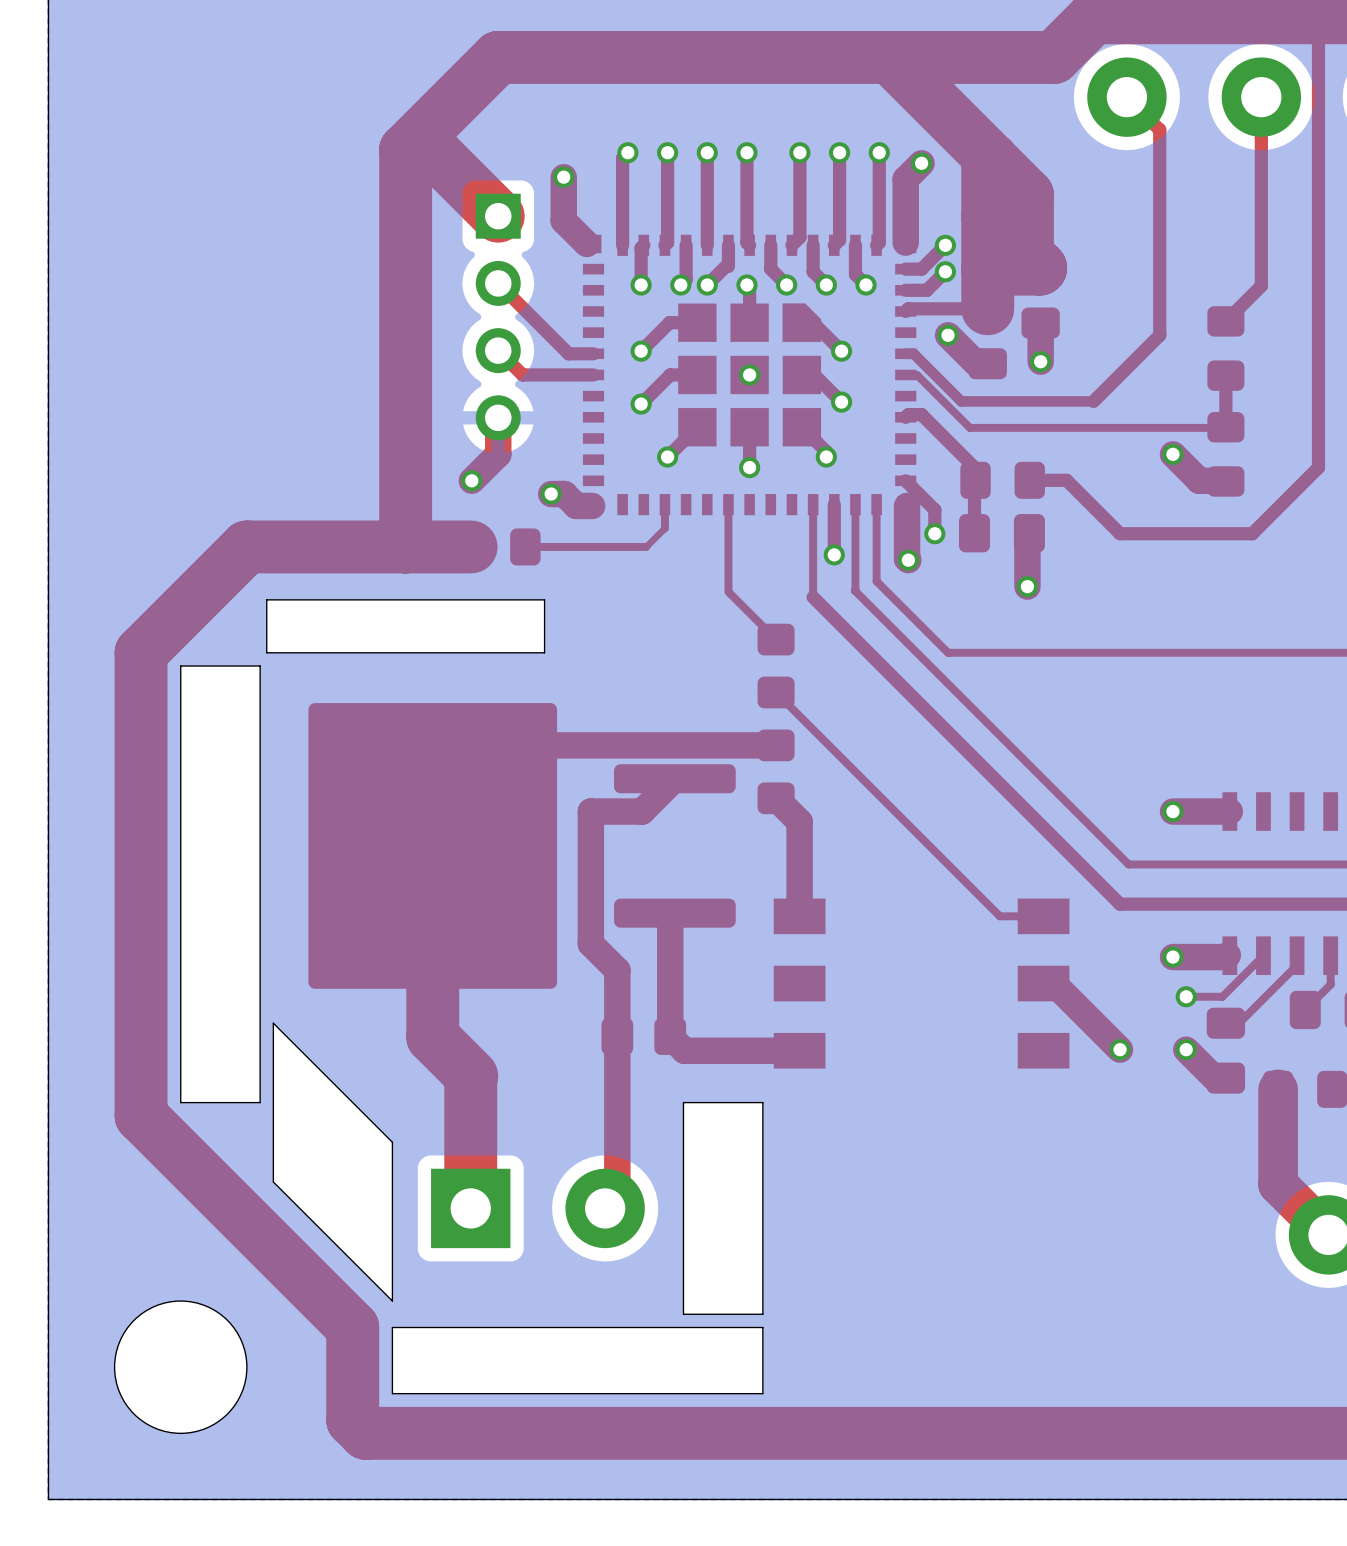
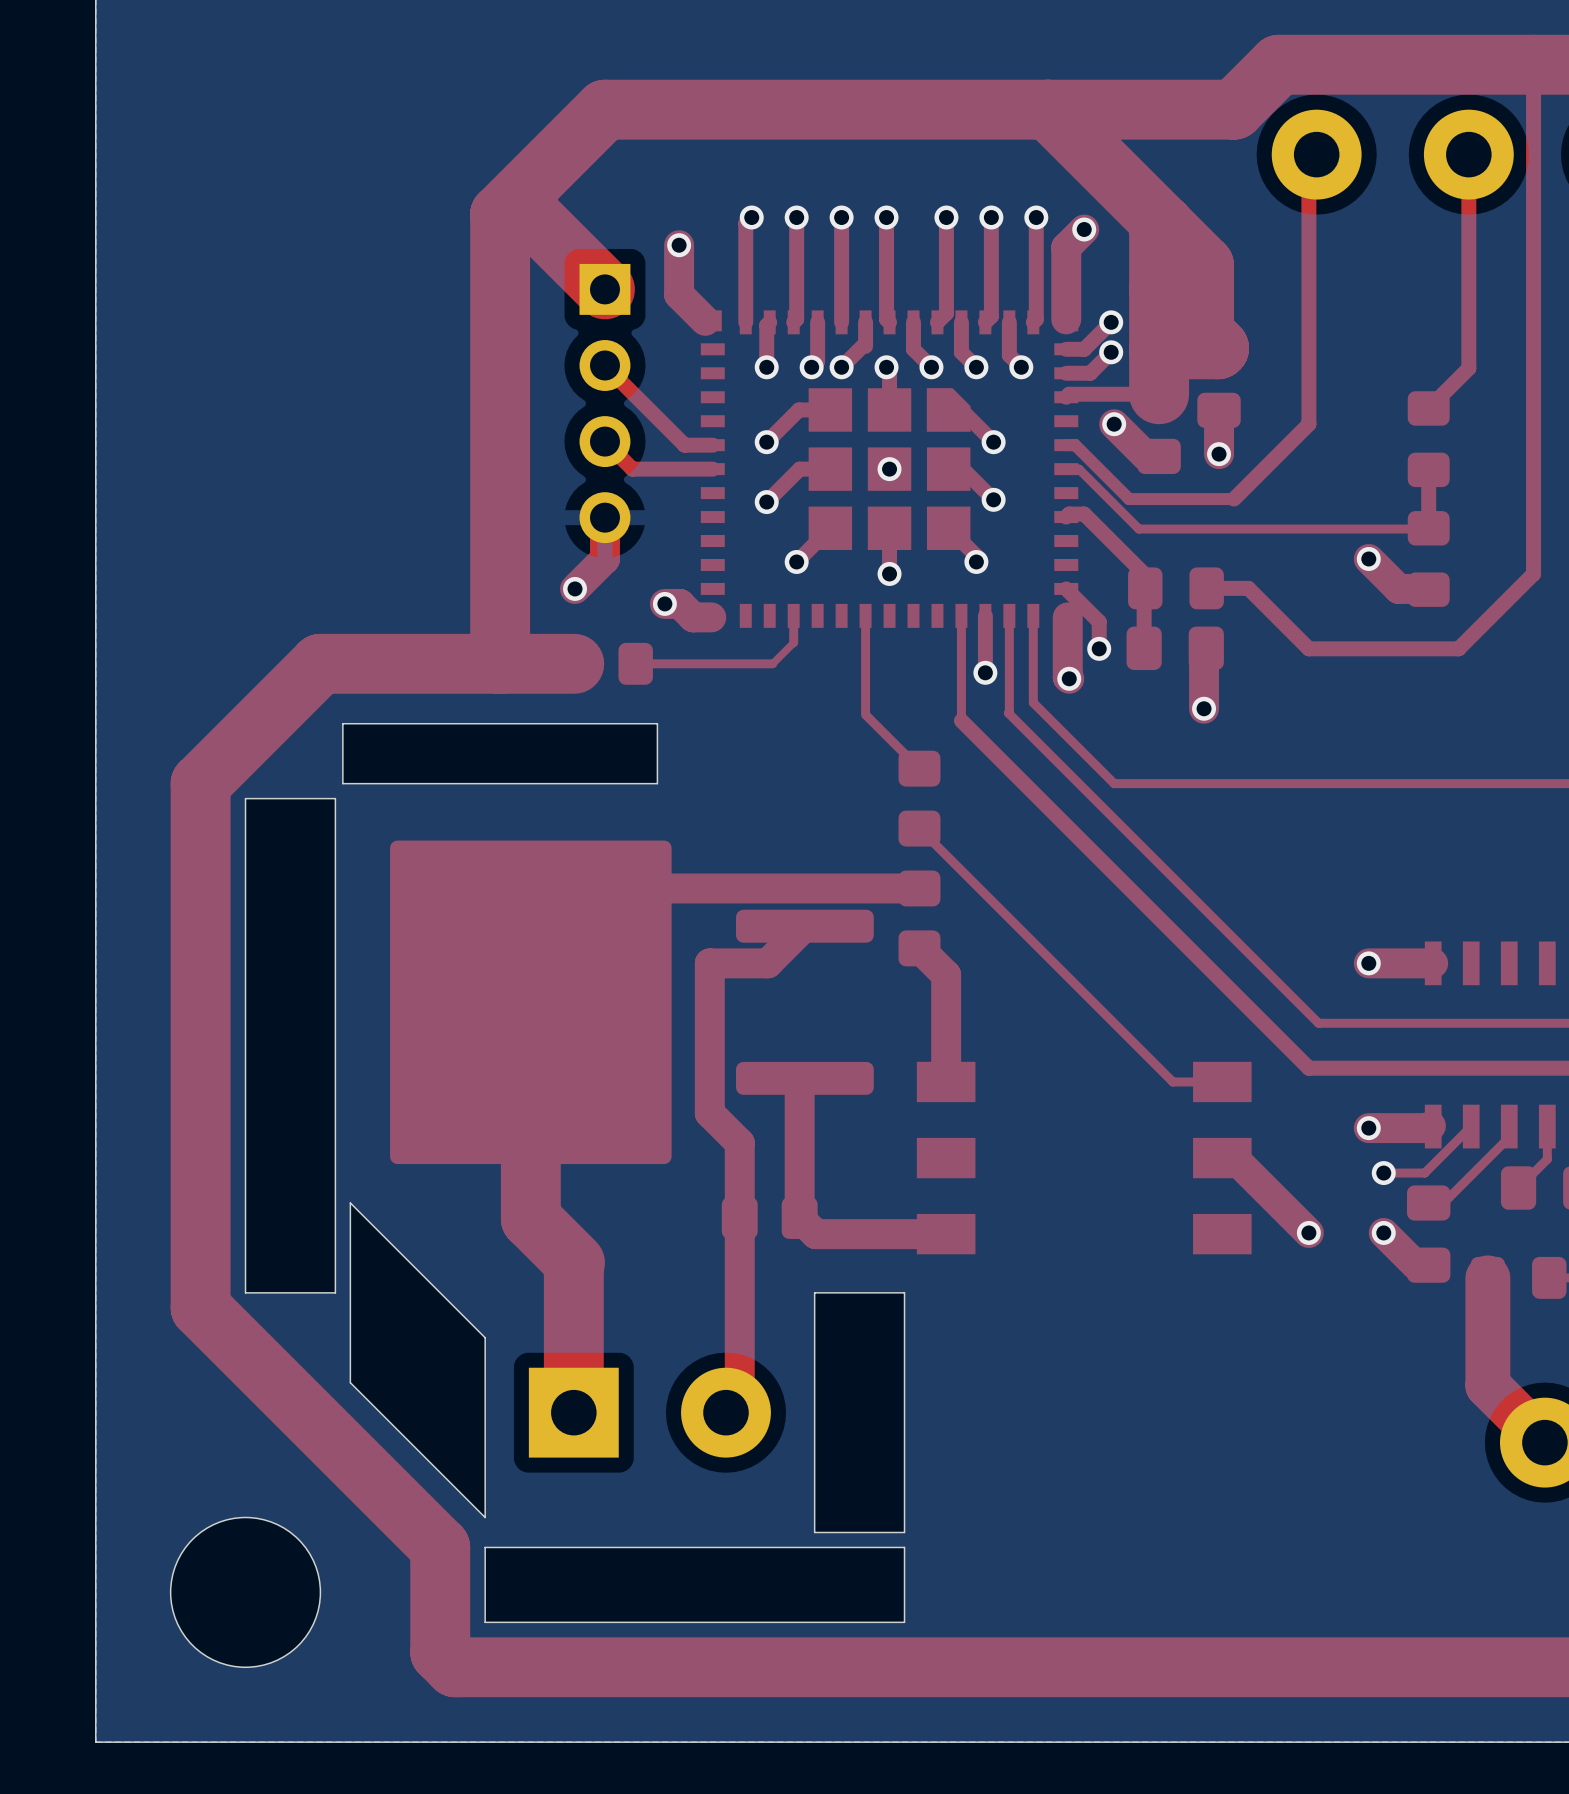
top track: (1126, 97) (1159, 129) (1159, 335) (1093, 401) (1053, 401) -> (1308, 162) (1308, 424) (1234, 499)

